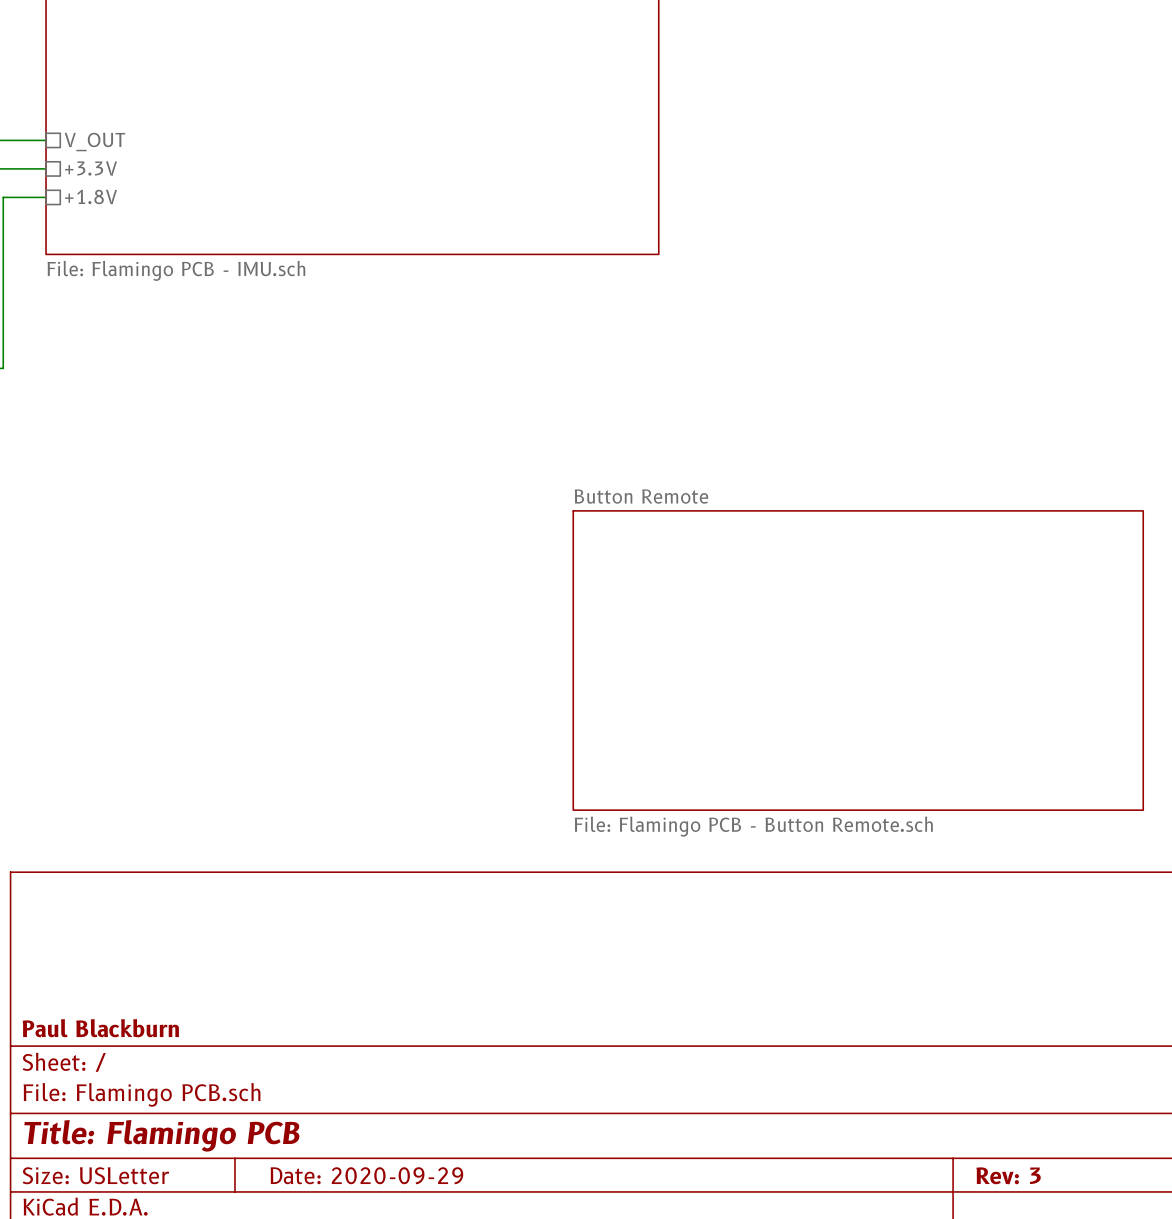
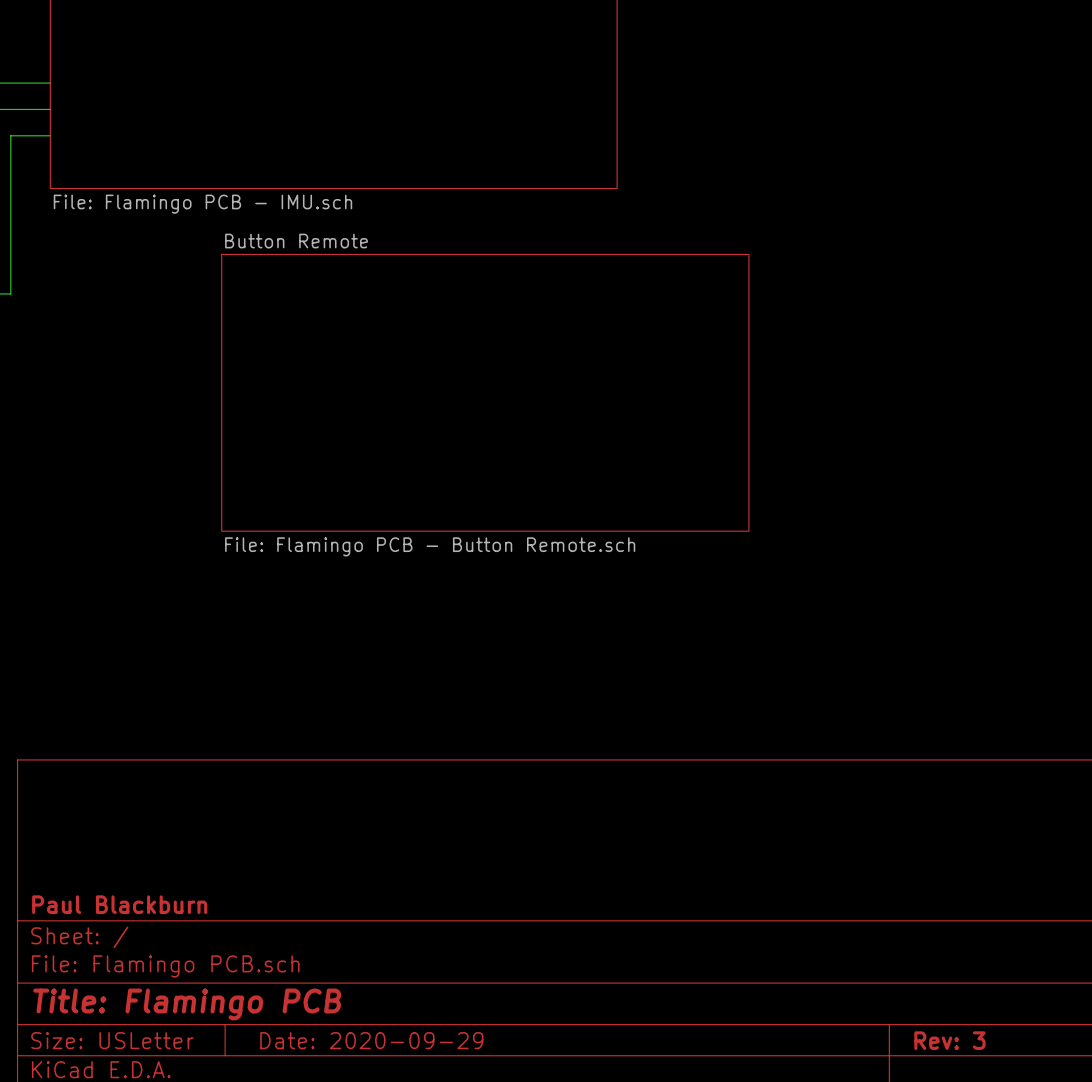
sheet pin: V_OUT (94, 142) -> none
sheet pin: +3.3V (91, 168) -> none
sheet pin: +1.8V (91, 196) -> none
sheet Button Remote: none -> File: Flamingo PCB - Button Remote.sch (485, 392)
sheet Button Remote: File: Flamingo PCB - Button Remote.sch (858, 660) -> none

